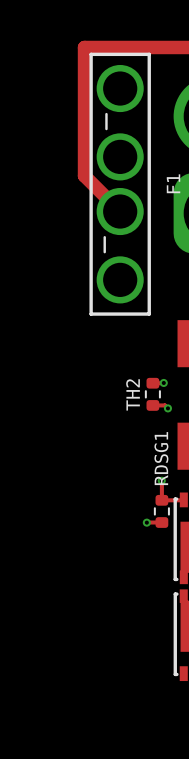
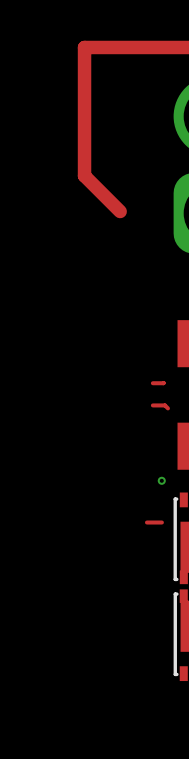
F1: (120, 184) -> none
via: (163, 382) -> none
TH2: (152, 394) -> none
via: (167, 408) -> none
track: (161, 480) (161, 500) (183, 499) -> none
RDSG1: (161, 511) -> none
via: (146, 522) -> none

